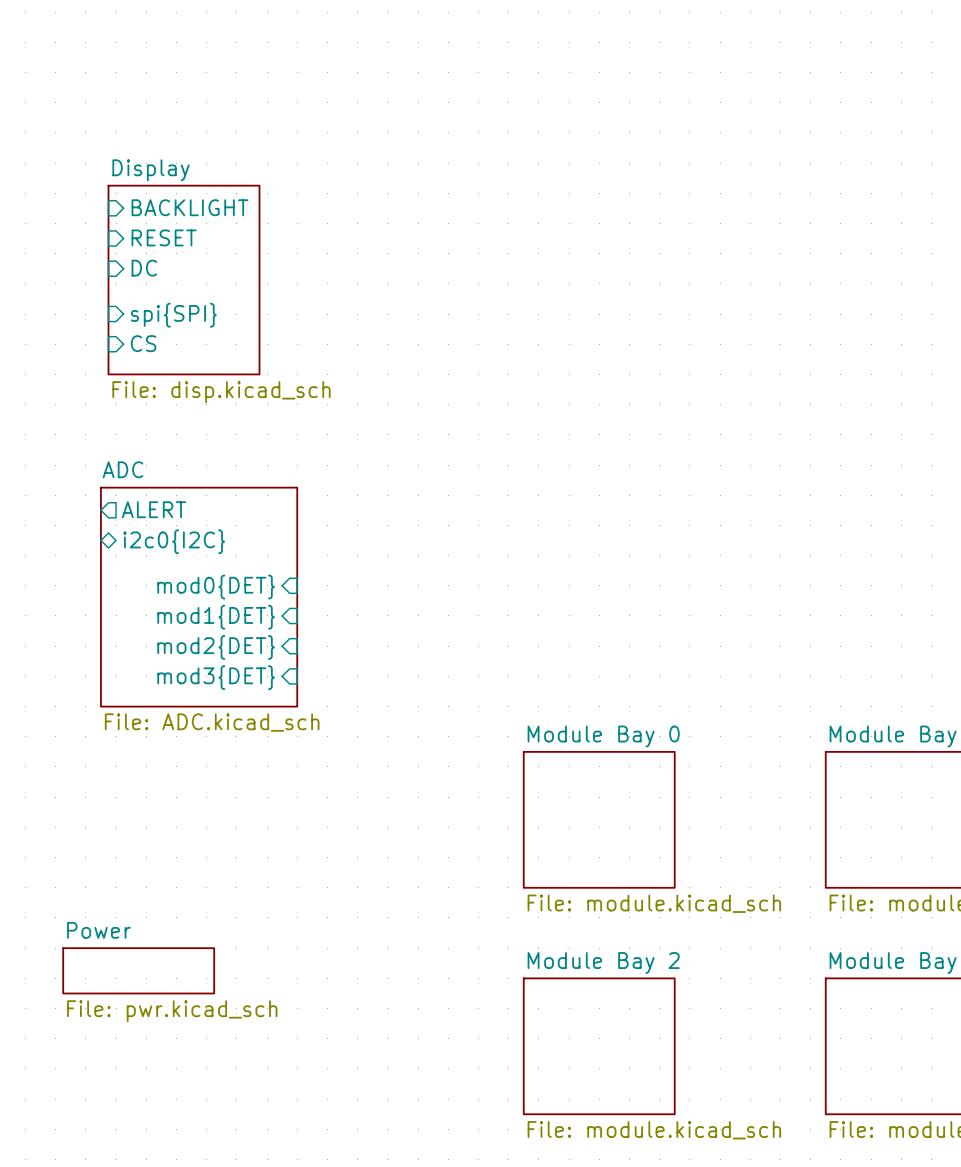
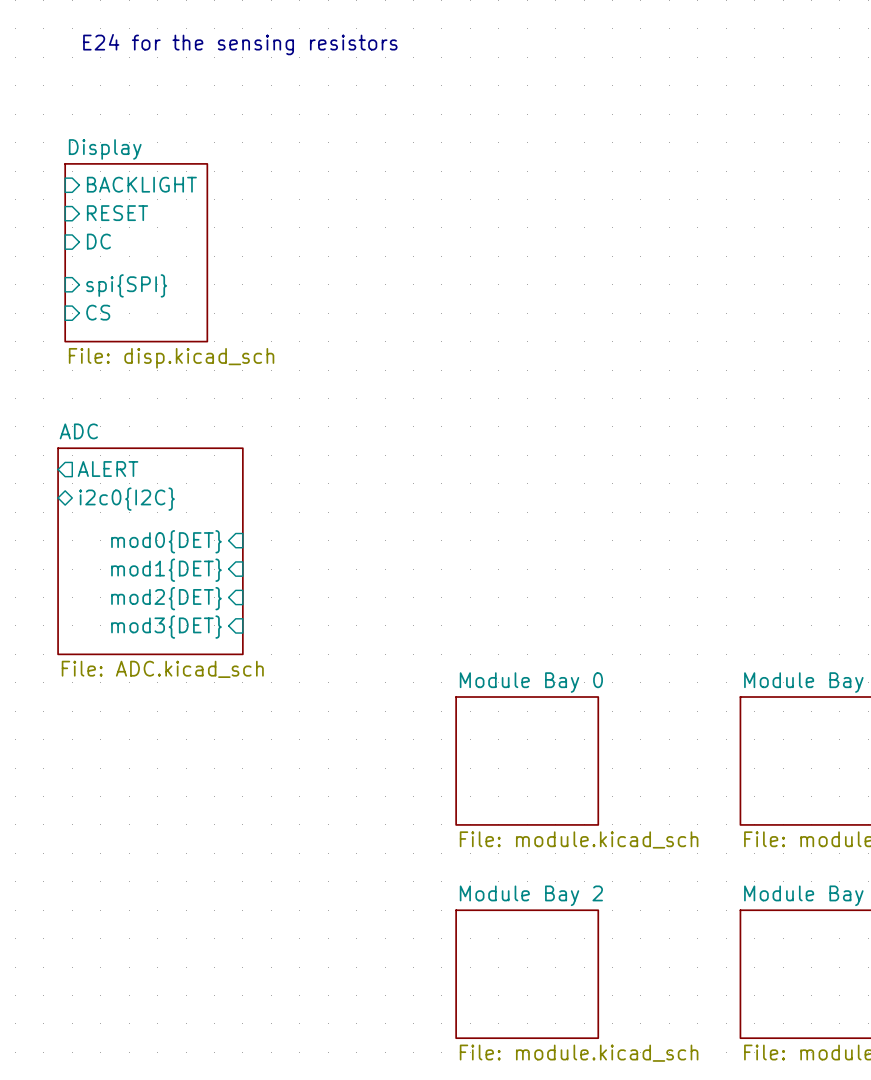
text: none -> E24 for the sensing resistors (240, 44)
sheet Power: File: pwr.kicad_sch (138, 970) -> none

